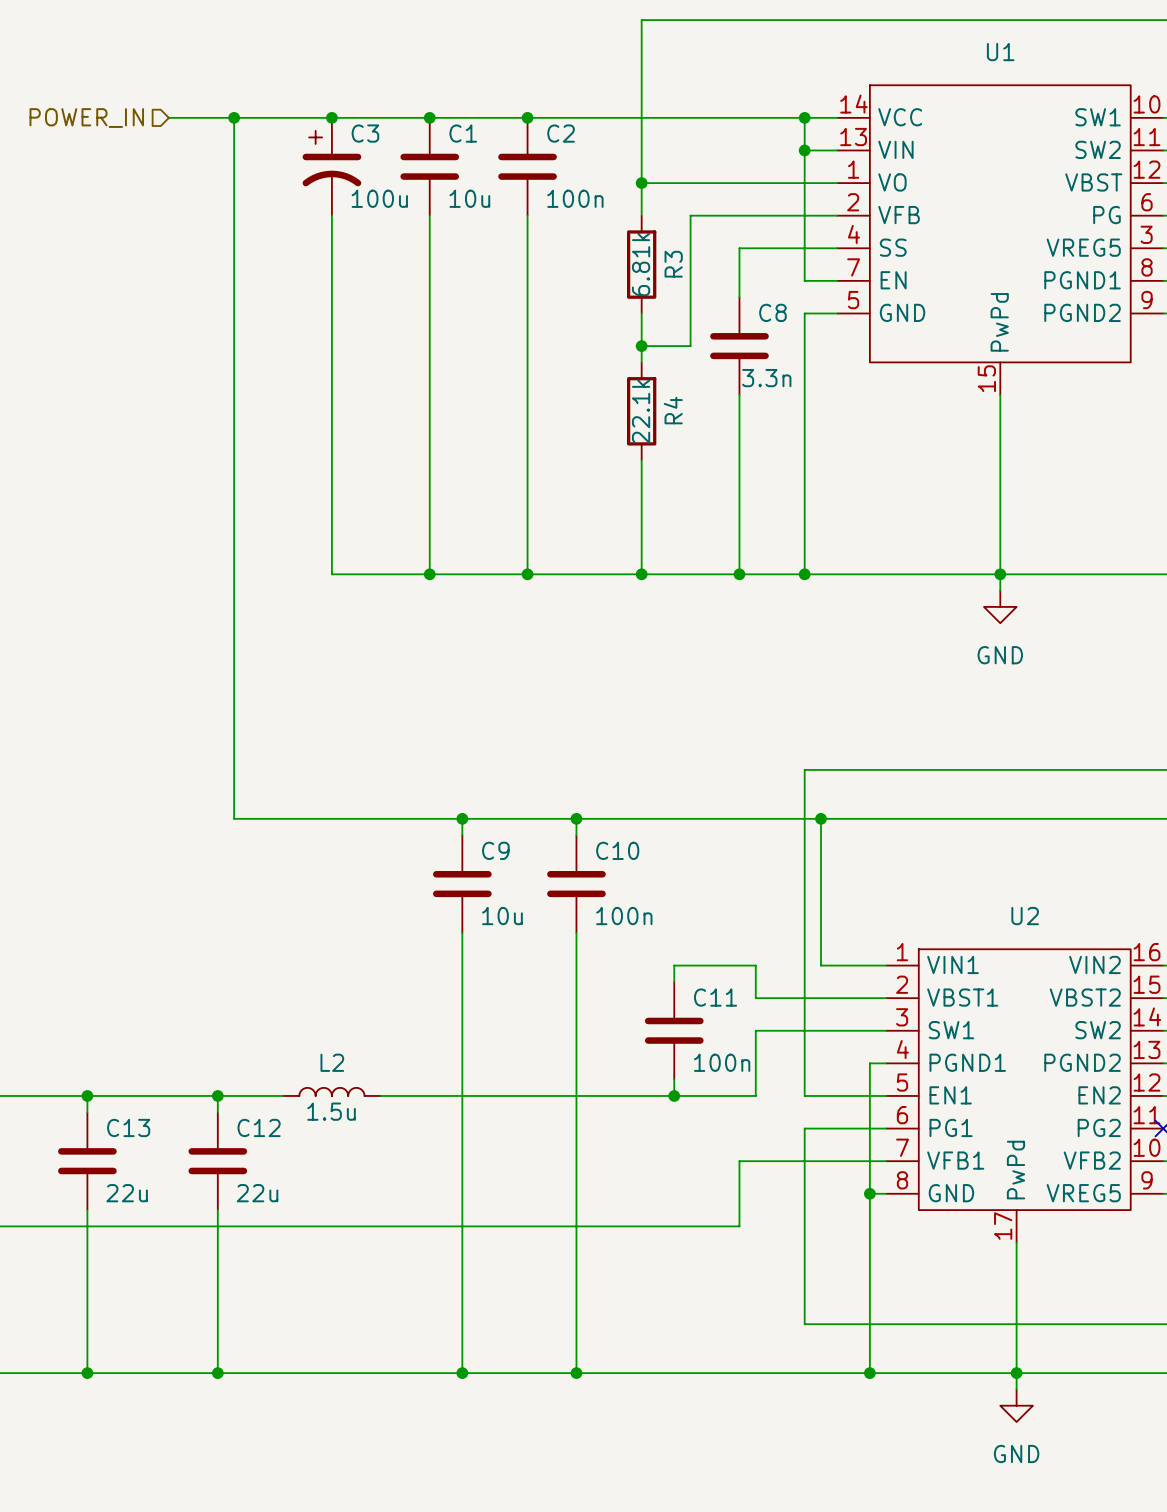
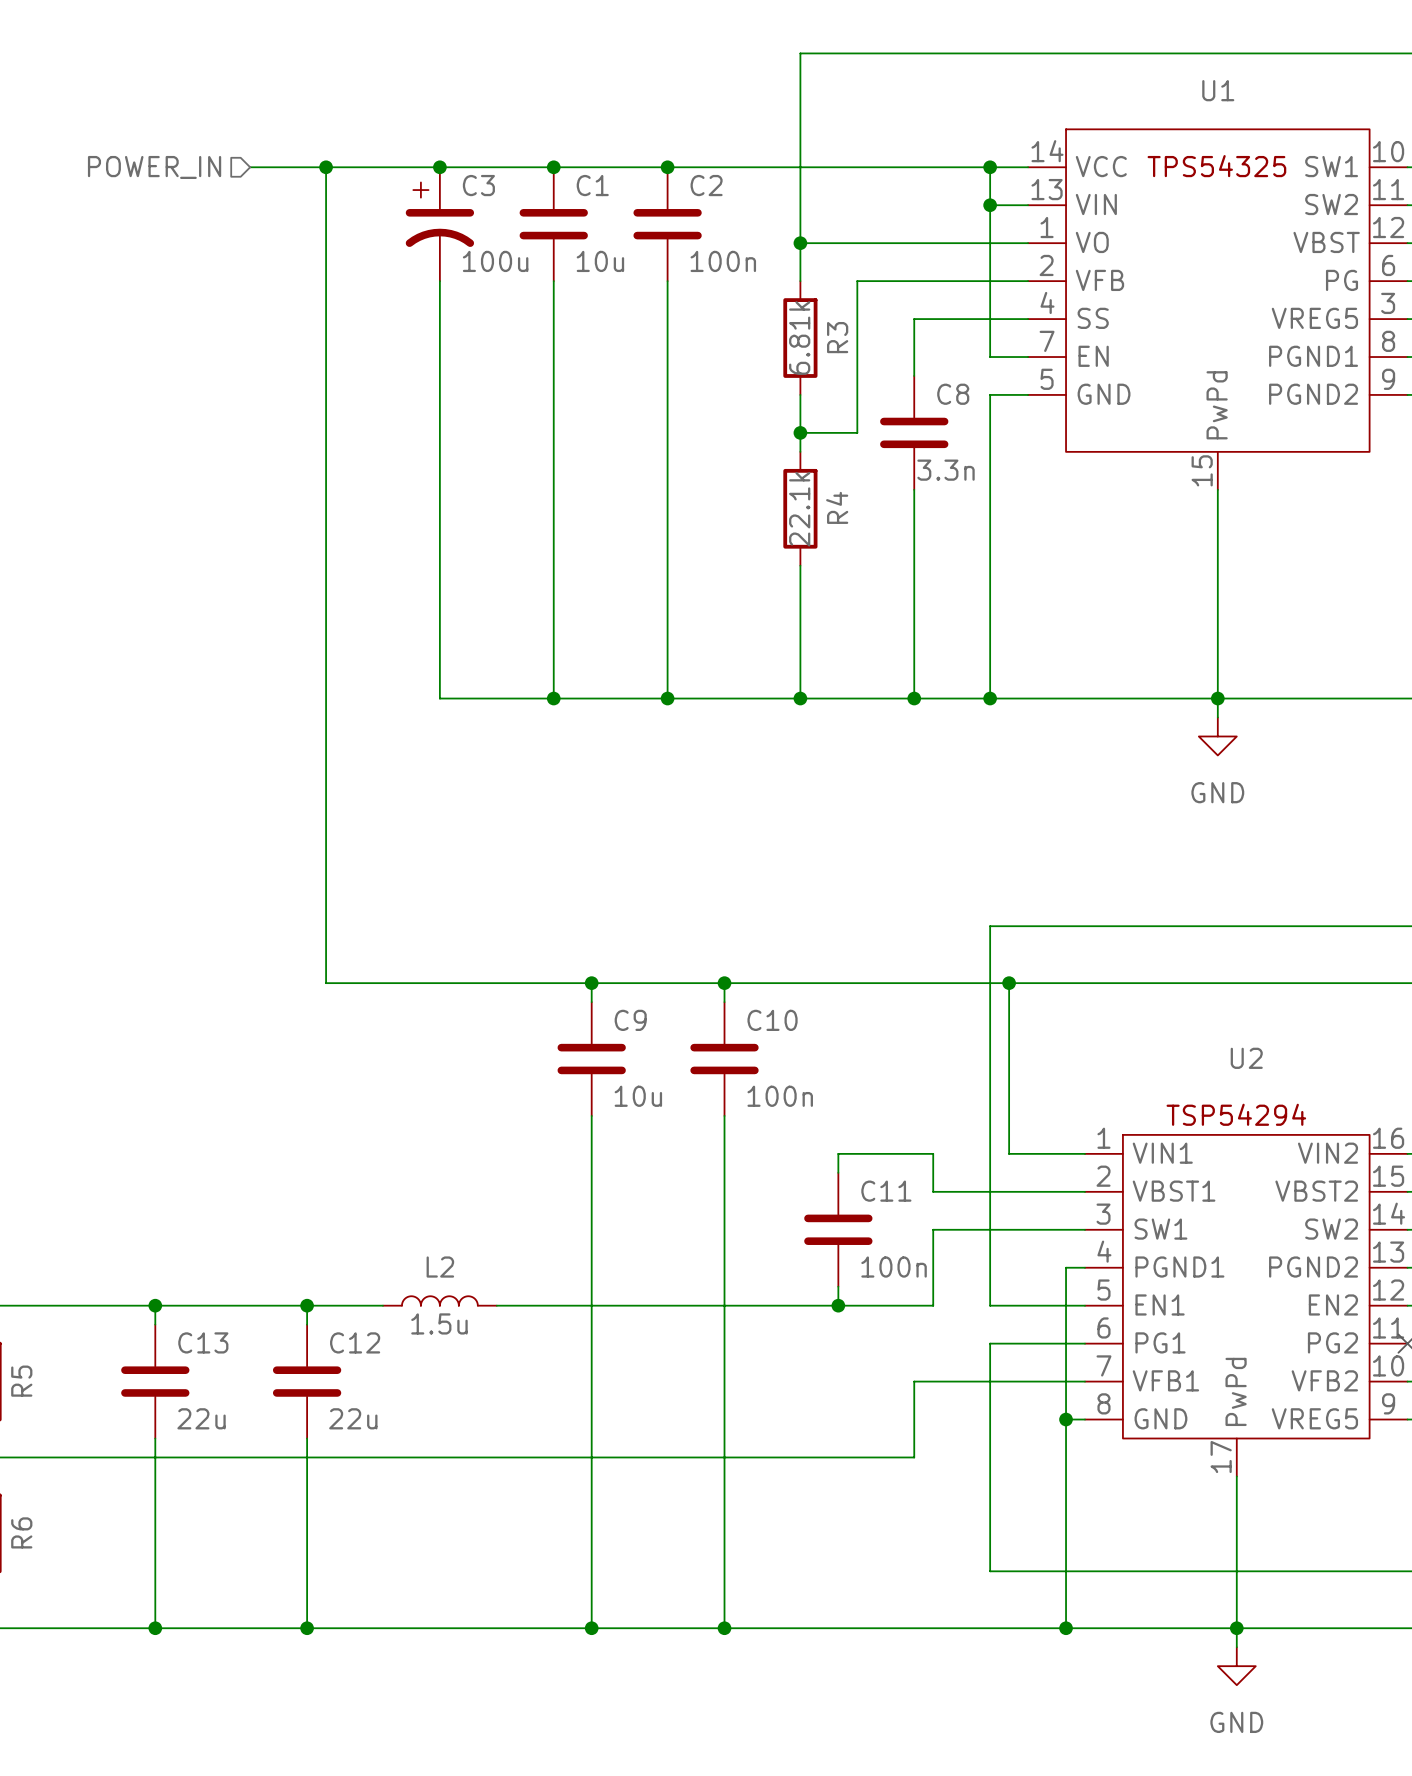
U1 text: none -> TPS54325 (1216, 166)
U2 name position: U2 (1025, 916) -> U2 (1246, 1058)
U2 text: none -> TSP54294 (1236, 1114)

